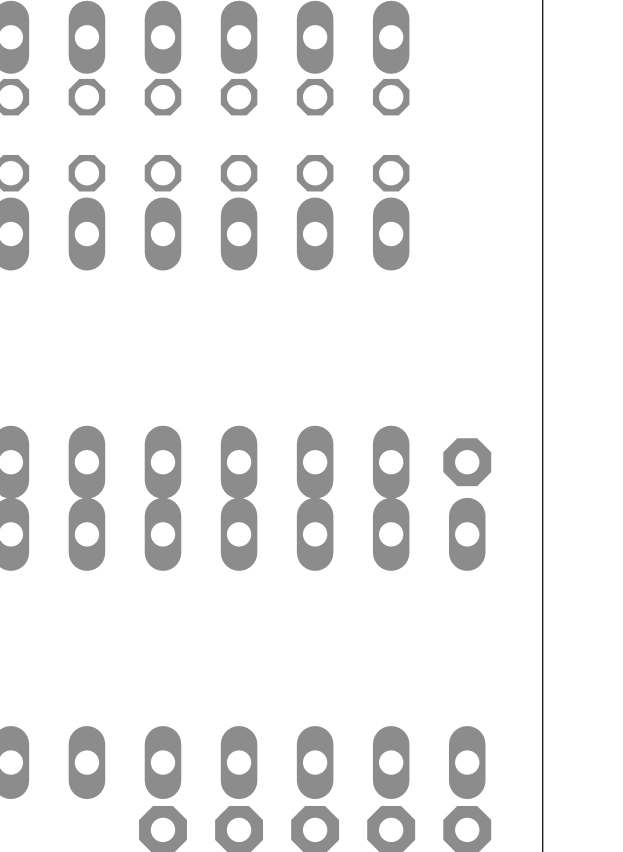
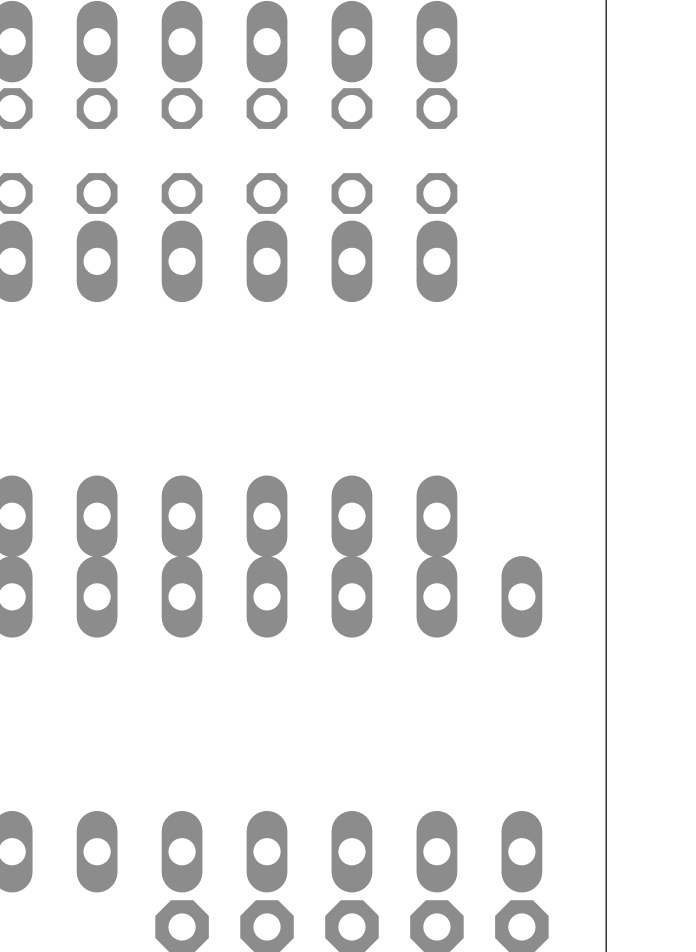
part: (467, 462) -> none

